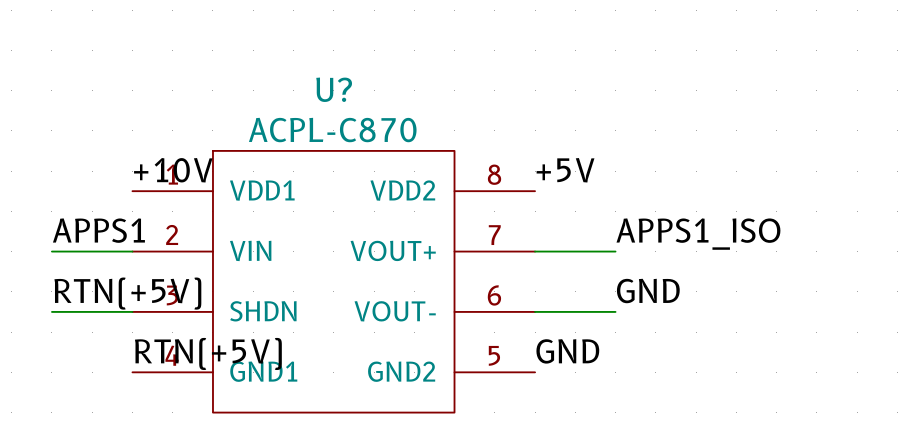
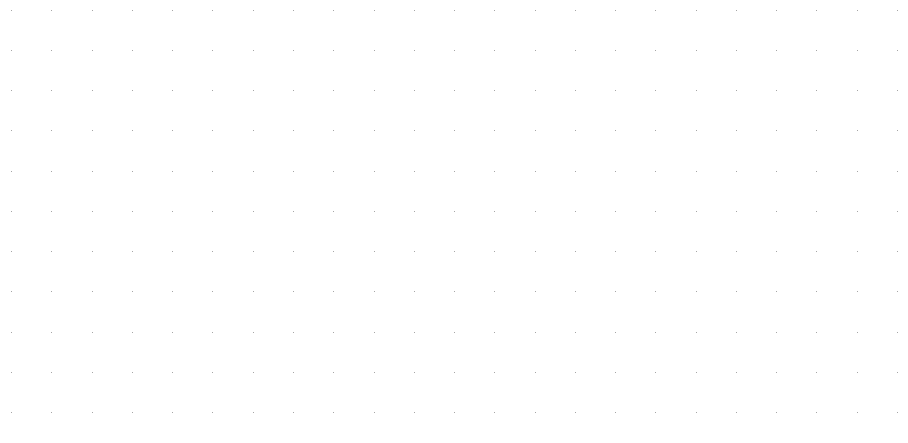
label: +10V (173, 170) -> none
label: +5V (565, 170) -> none
label: APPS1 (98, 230) -> none
label: APPS1_ISO (698, 234) -> none
wire: (51, 251) (132, 251) -> none
wire: (535, 251) (615, 251) -> none
U?: ACPL-C870 (333, 281) -> none
label: GND (648, 291) -> none
label: RTN(+5V) (127, 293) -> none
wire: (51, 311) (132, 311) -> none
wire: (535, 311) (615, 311) -> none
label: GND (567, 351) -> none
label: RTN(+5V) (208, 353) -> none

